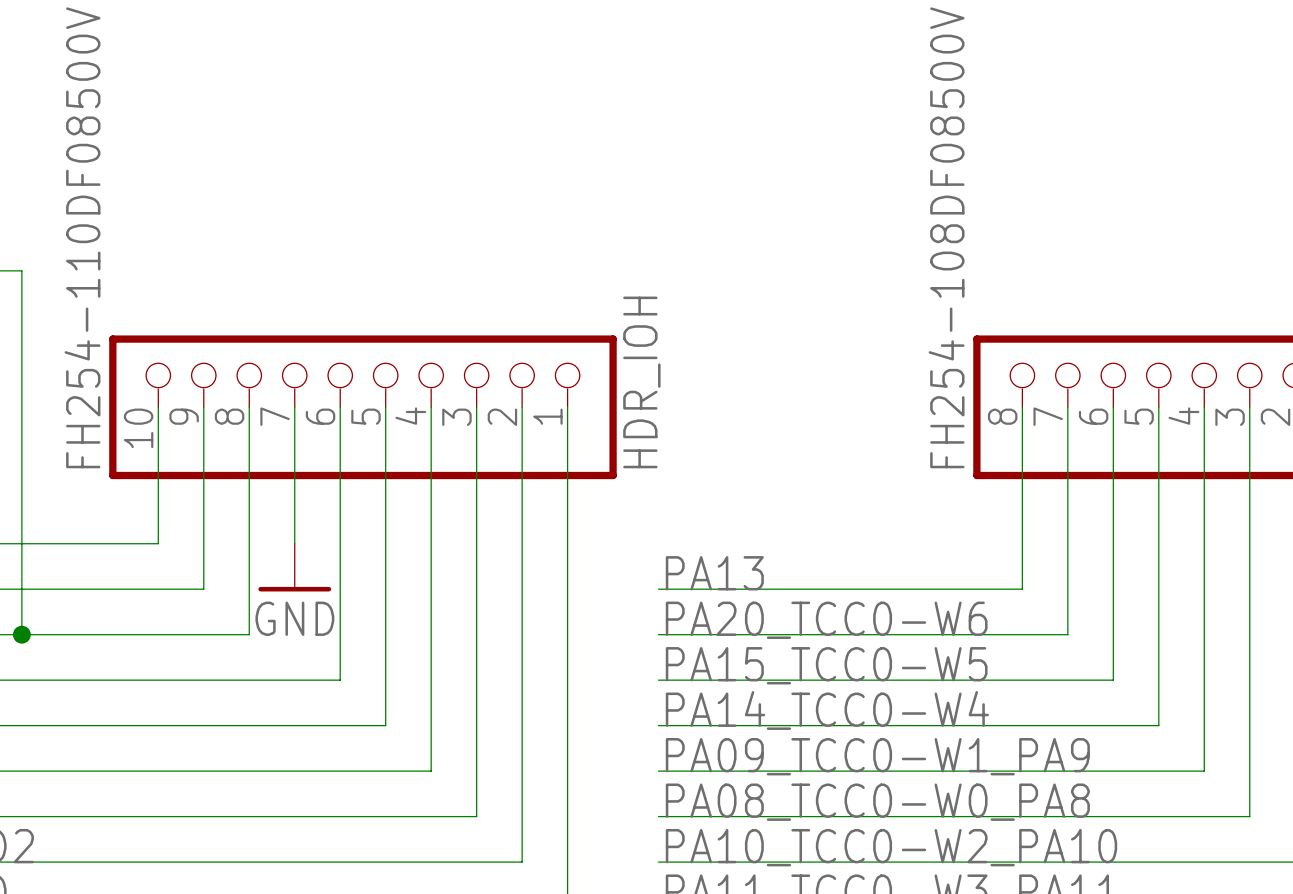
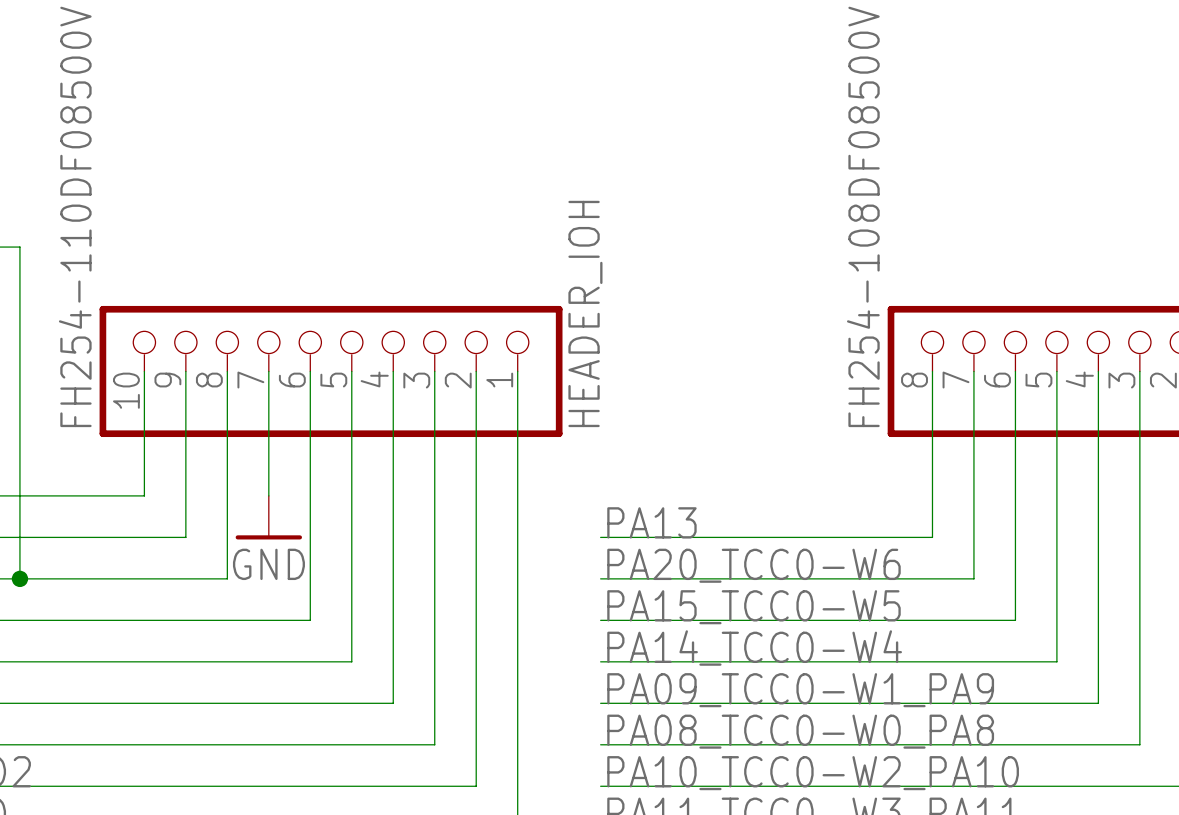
HDR_IOH name: HDR_IOH (641, 382) -> HEADER_IOH (585, 313)

